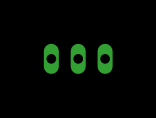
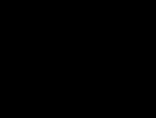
part: (78, 58) -> none

